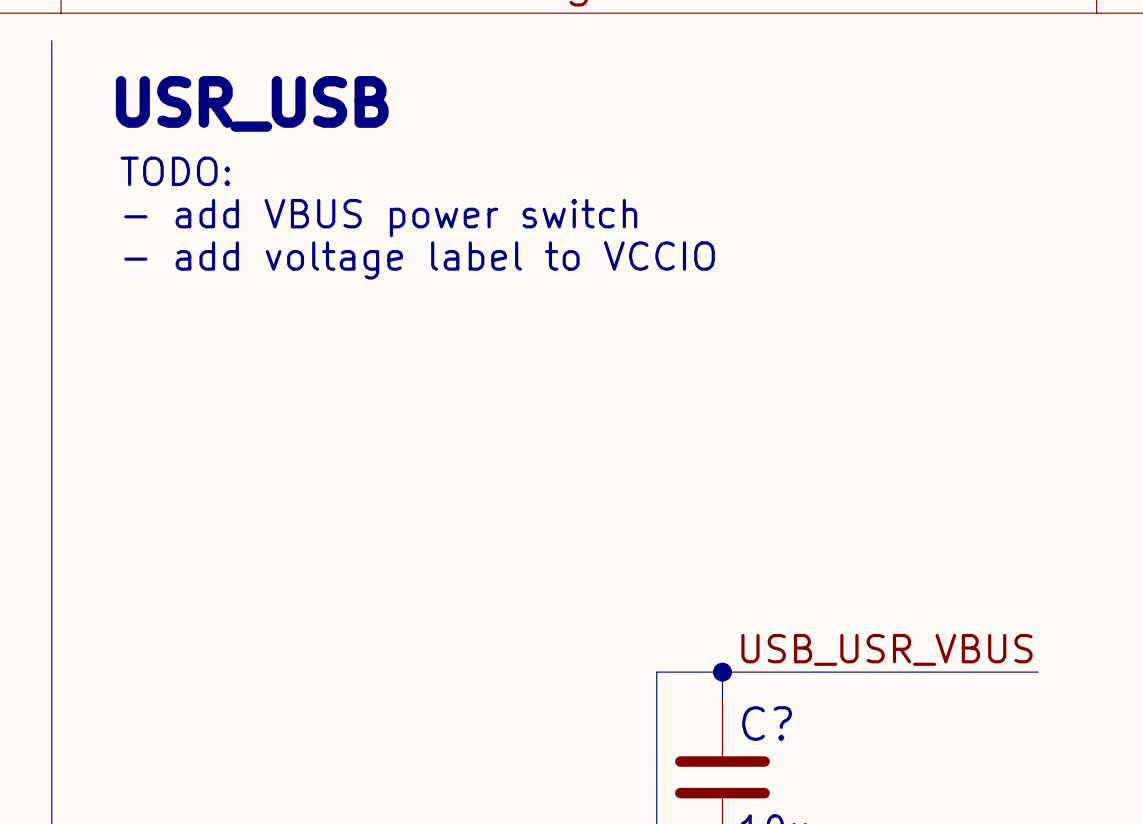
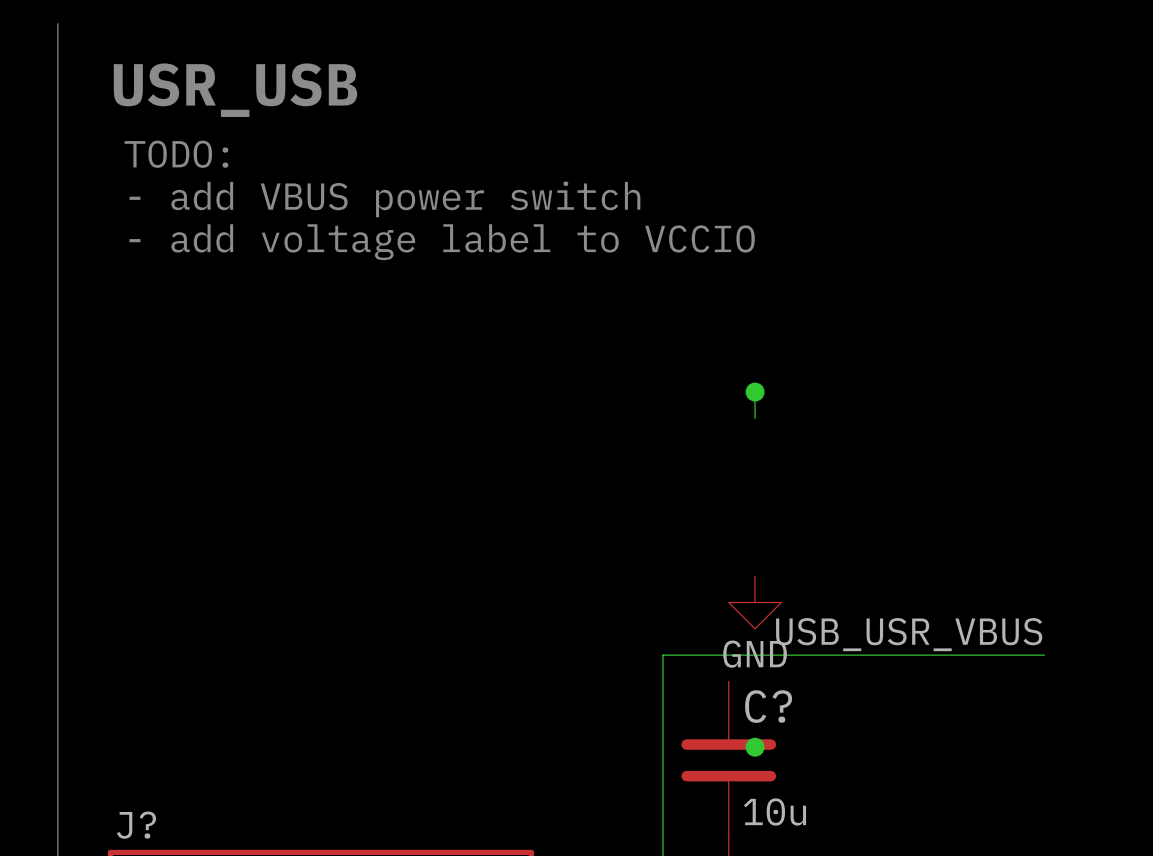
junction: none -> (755, 392)
power symbol: none -> GND (755, 602)
wire: (722, 672) (722, 698) -> (755, 392) (755, 418)
junction position: (722, 672) -> (755, 747)

